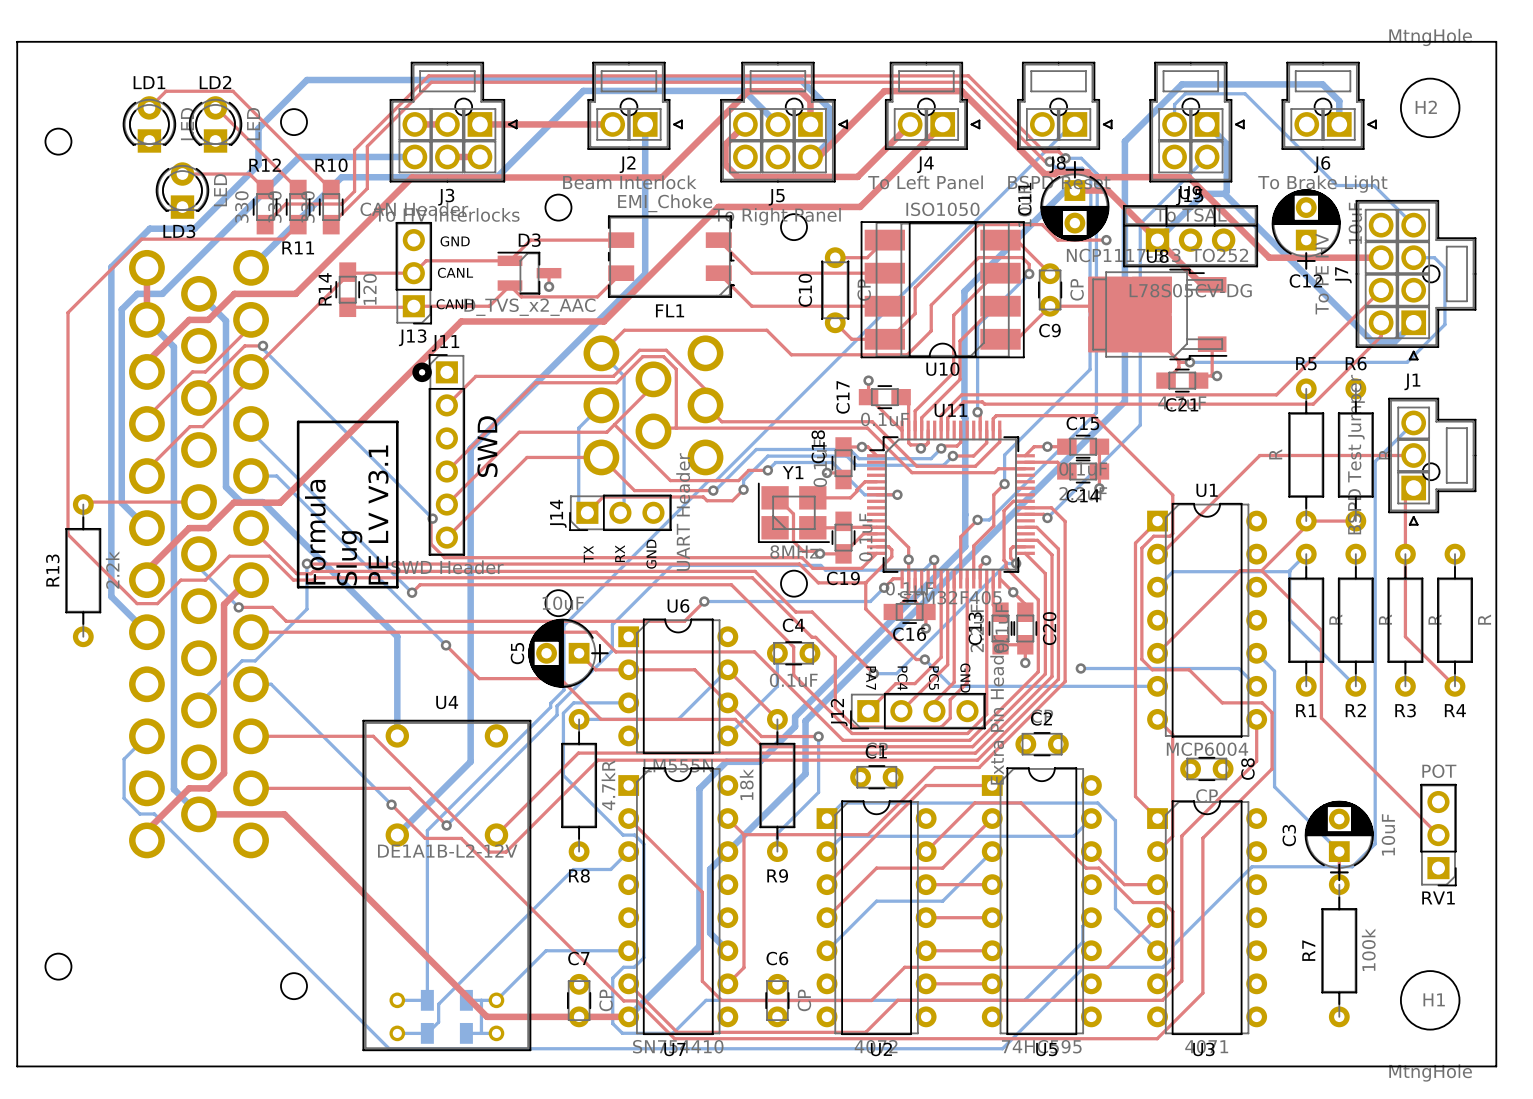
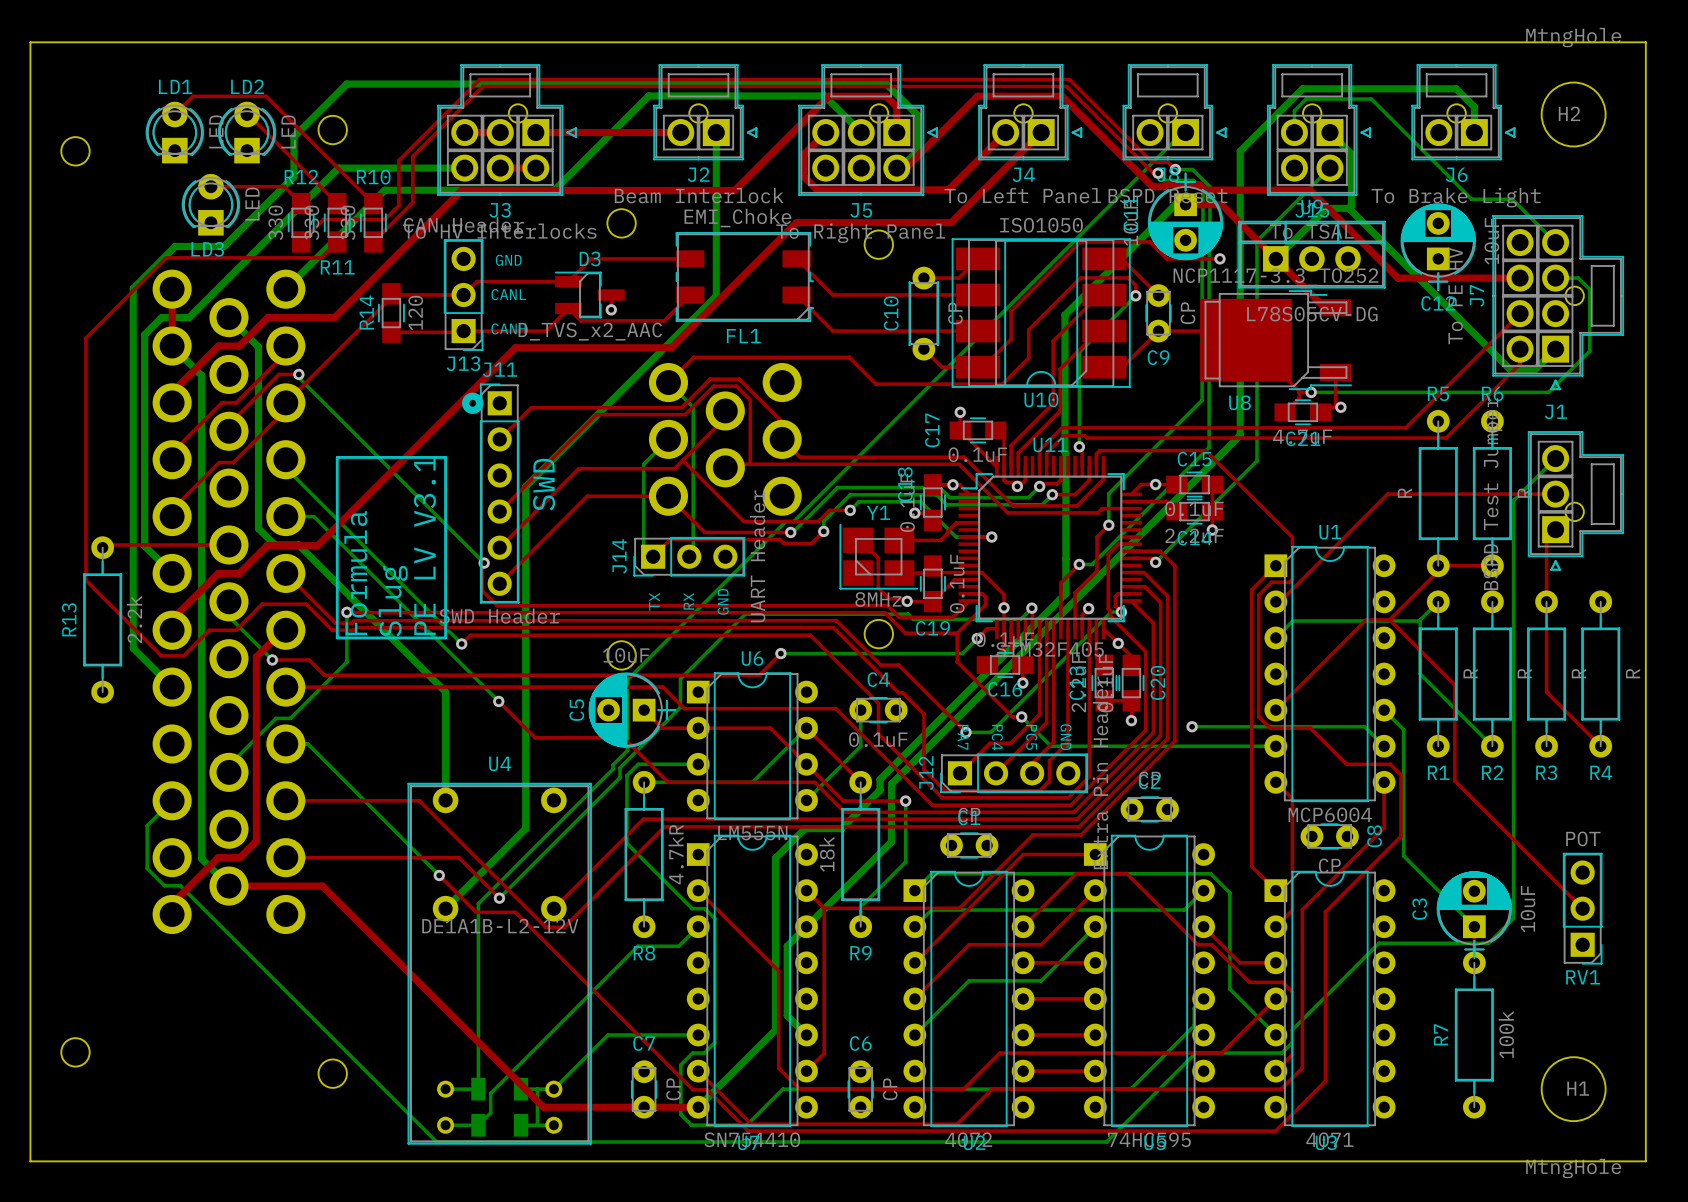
U8 name position: U8 (1157, 256) -> U8 (1239, 402)

